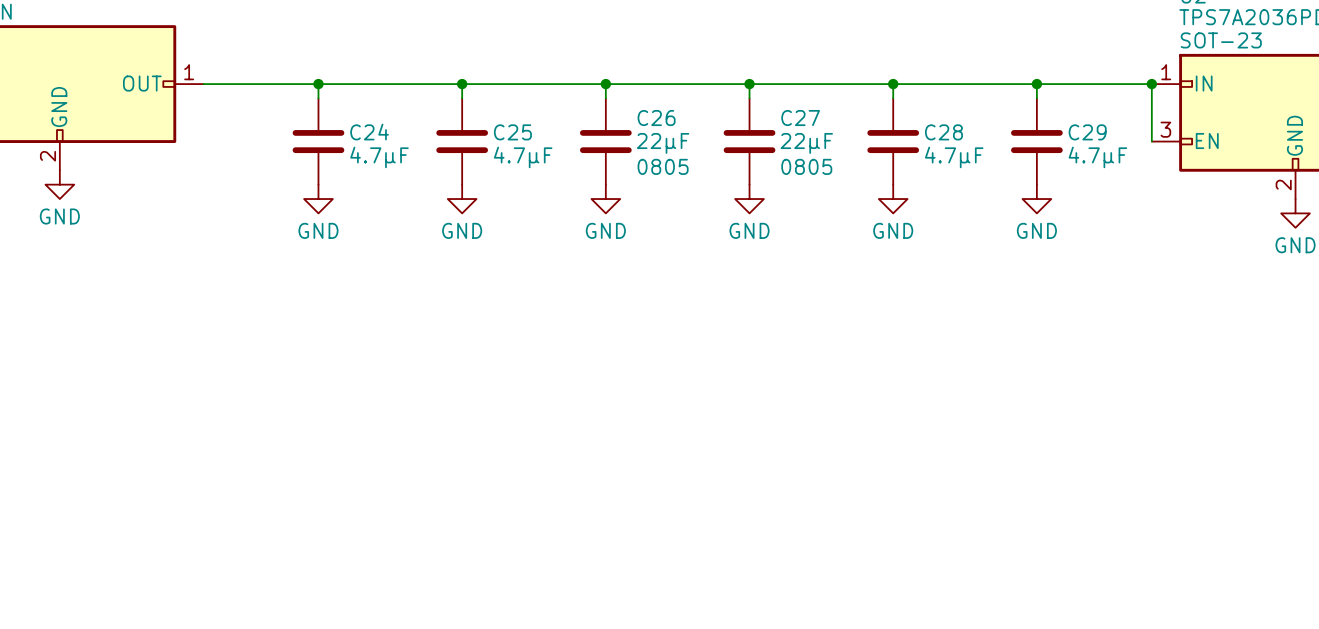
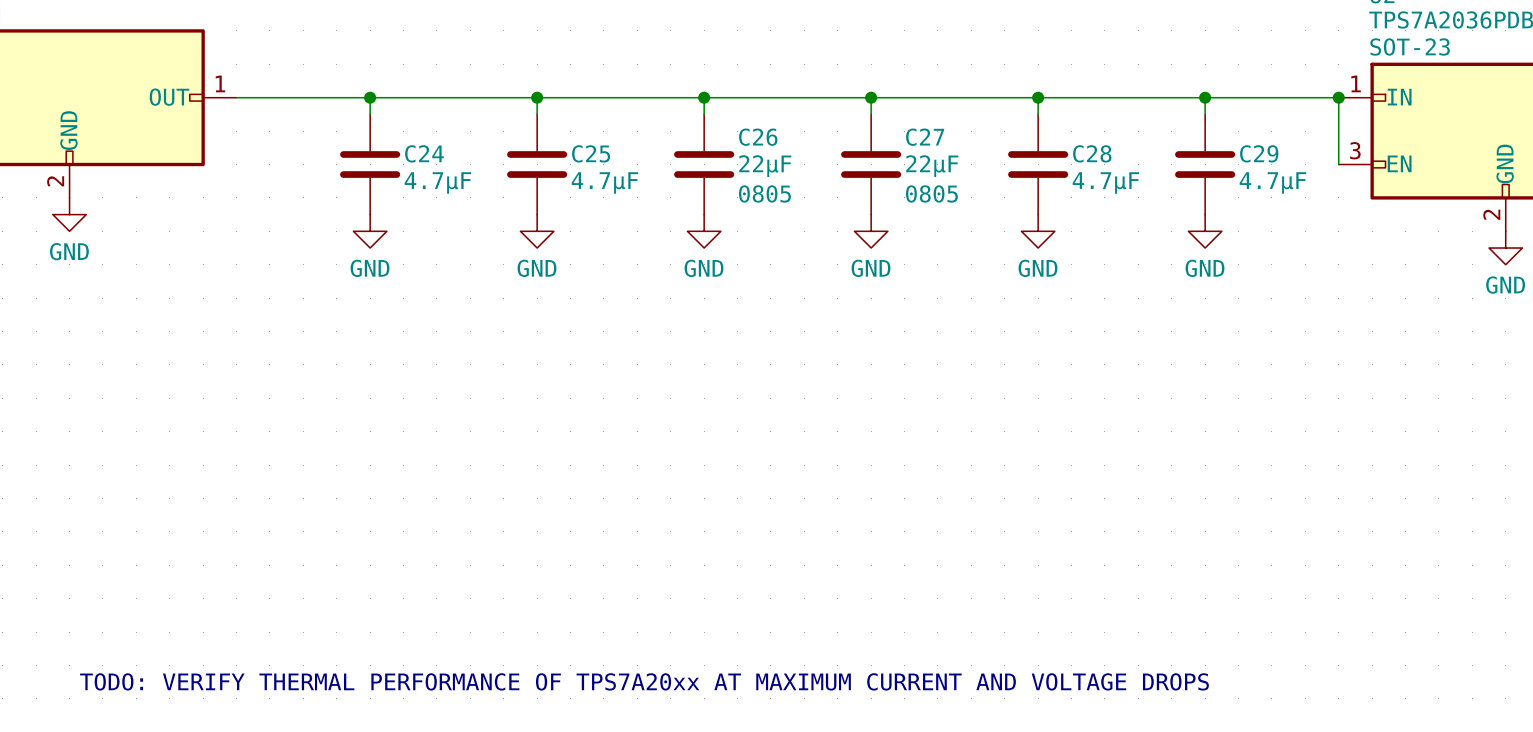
text: none -> TODO: VERIFY THERMAL PERFORMANCE OF TPS7A20xx AT MAXIMUM CURRENT AND VOLTAGE DROPS (644, 681)

